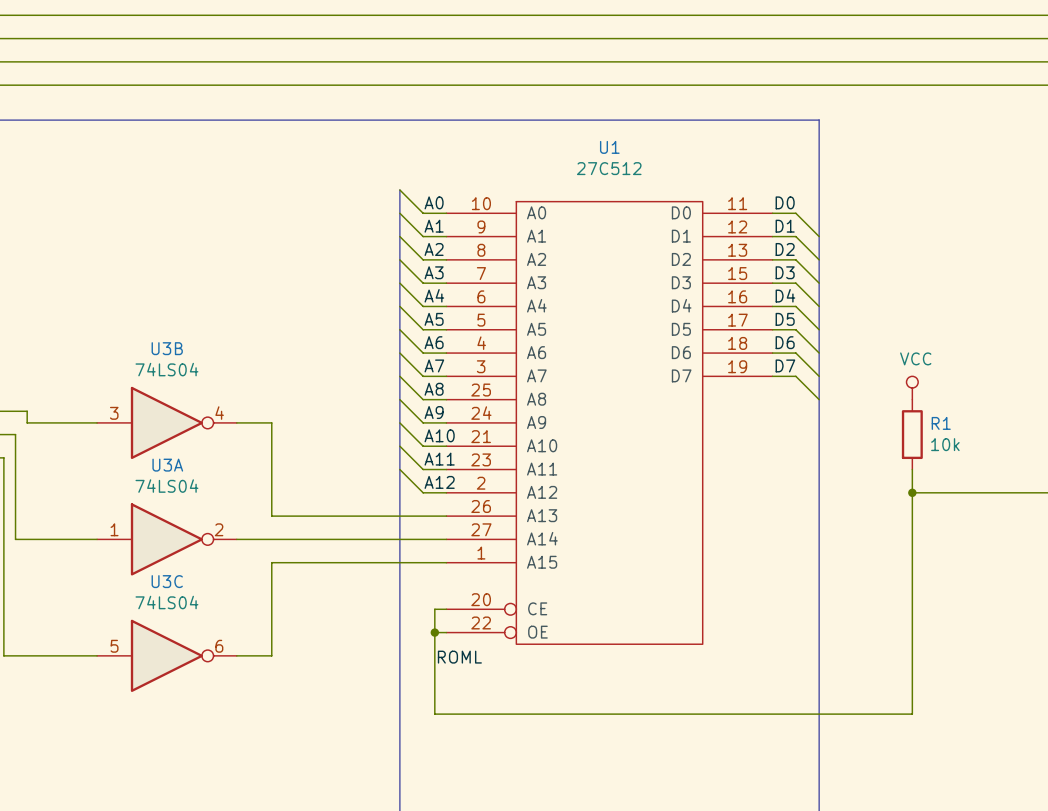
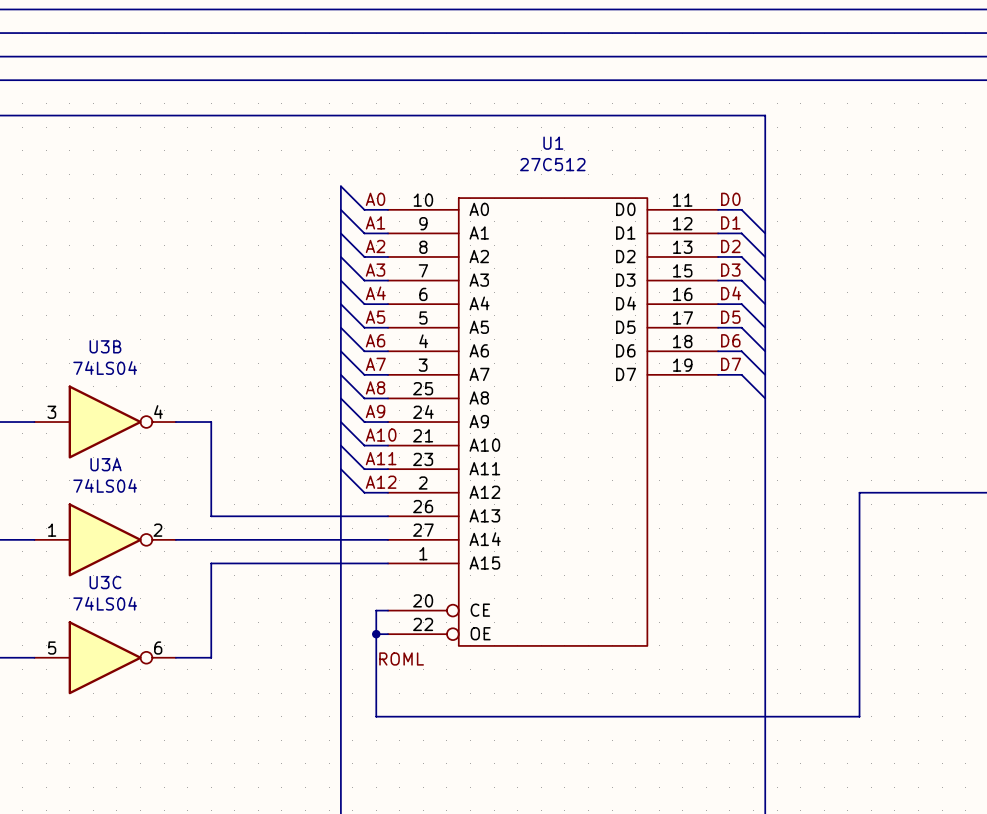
power symbol: VCC (912, 387) -> none
R1: 10k (912, 434) -> none
wire: (912, 469) (912, 492) -> none
junction: (912, 492) -> none

